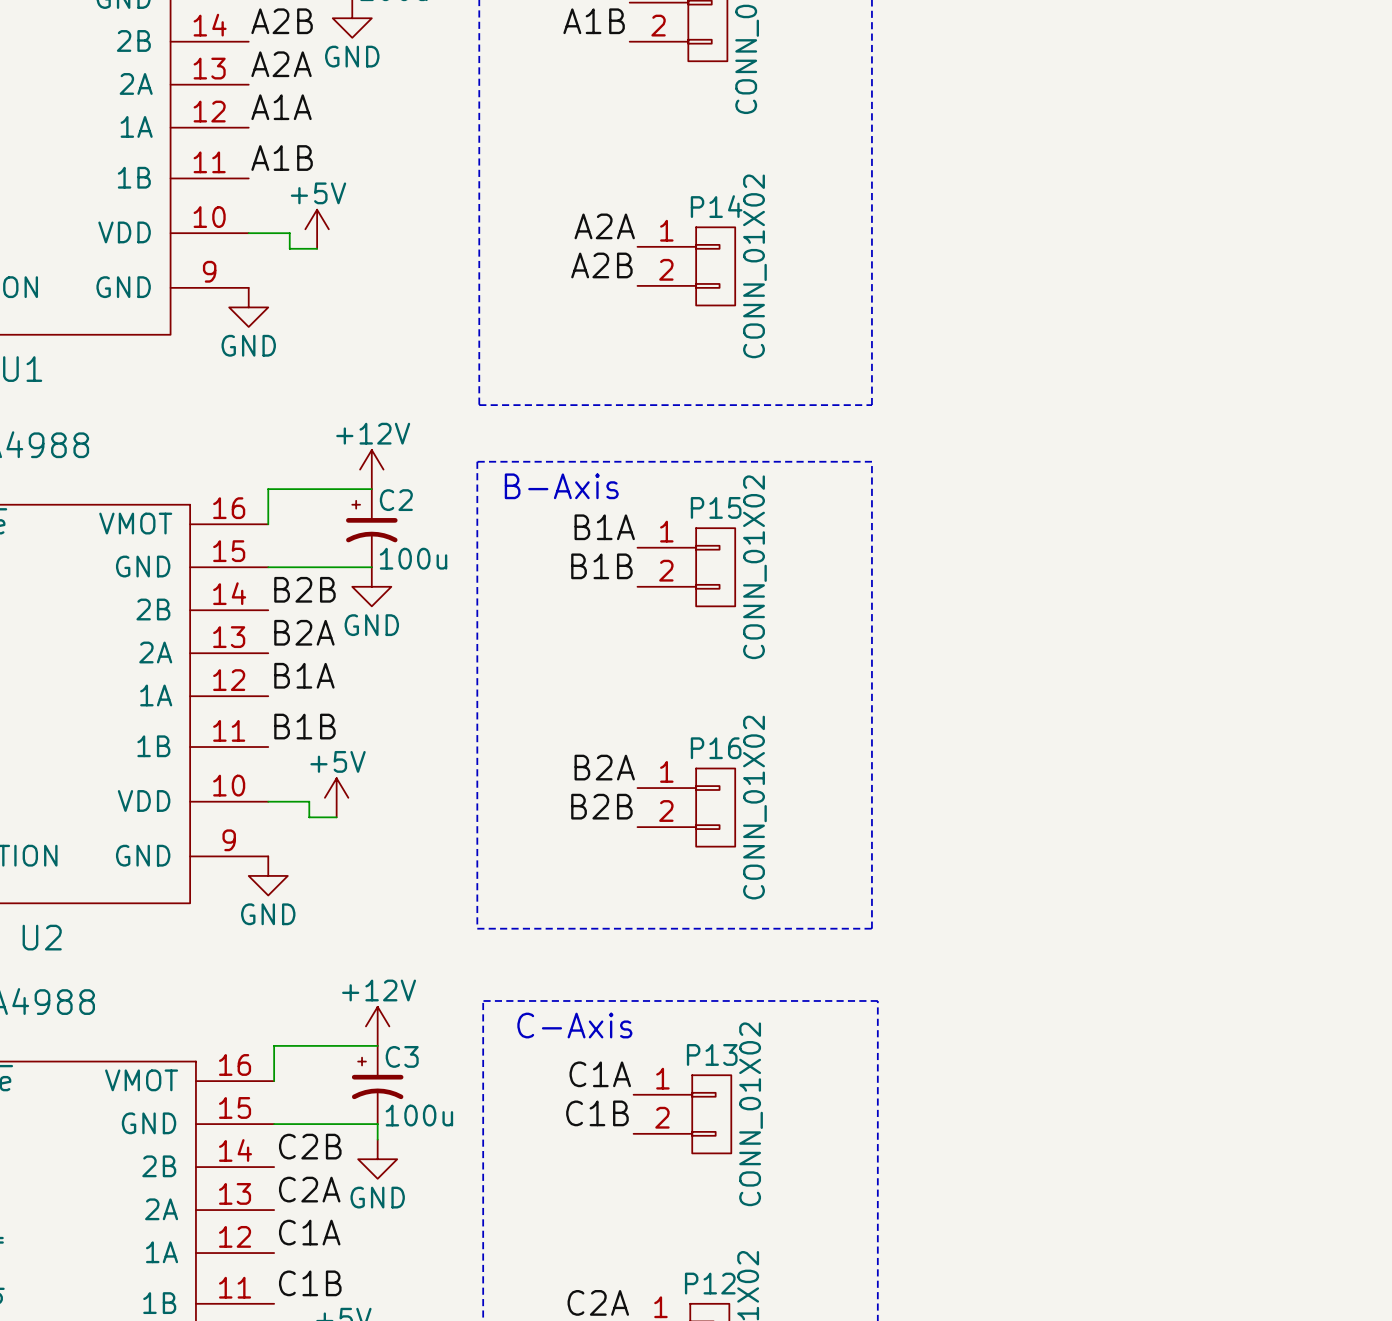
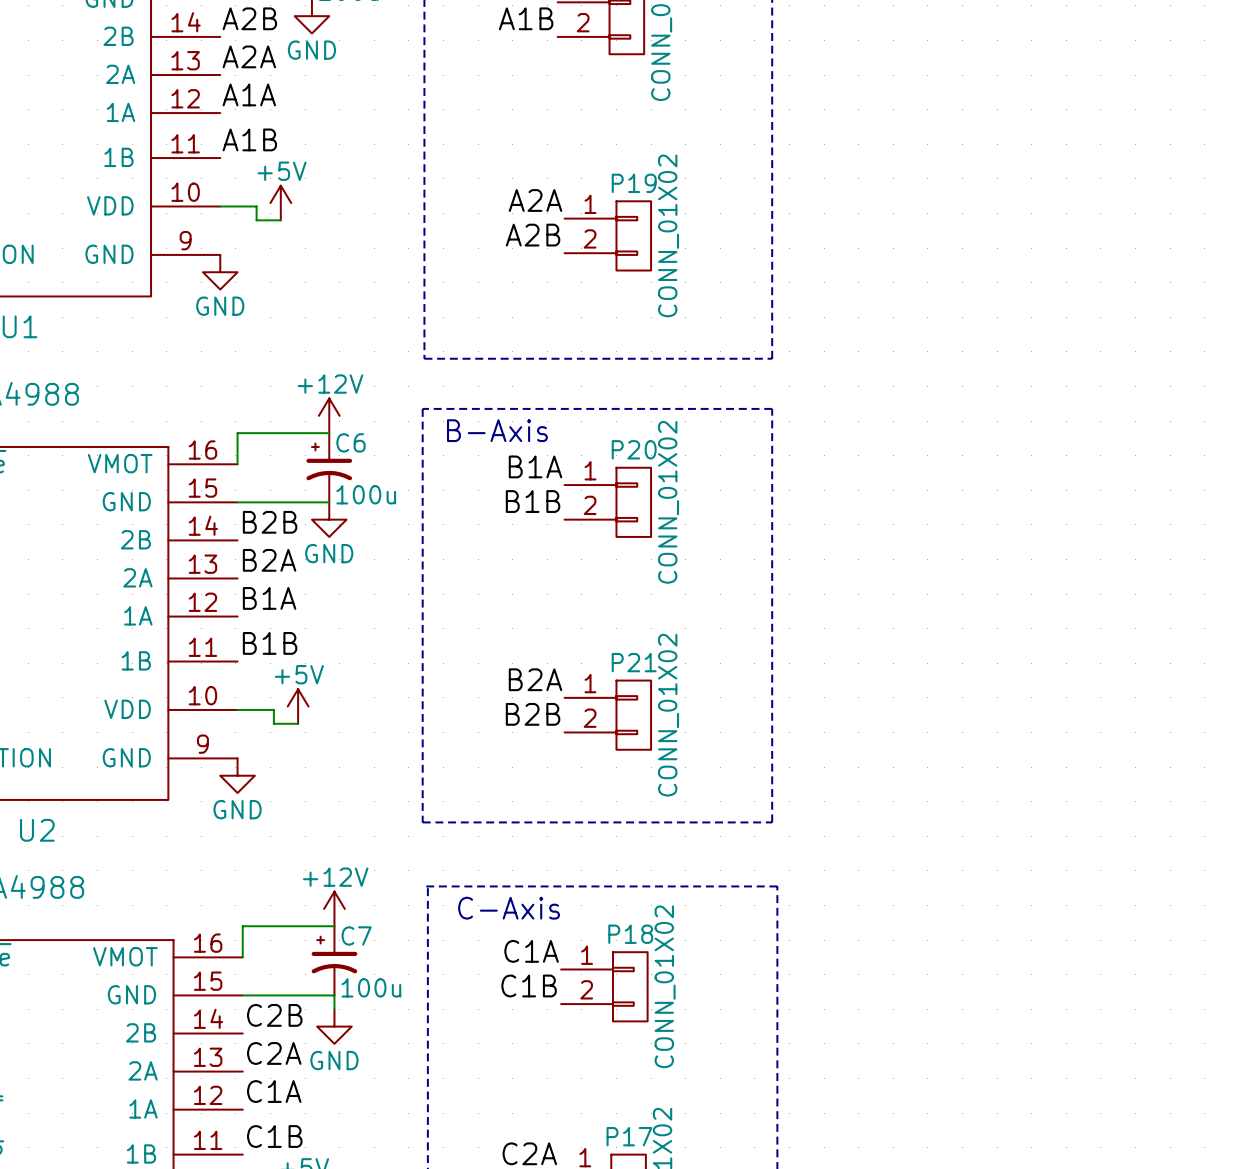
P14 name: P14 (716, 206) -> P19 (634, 183)
C2 name: C2 (396, 500) -> C6 (350, 442)
P15 name: P15 (716, 507) -> P20 (634, 449)
P16 name: P16 (716, 748) -> P21 (634, 662)
P13 name: P13 (712, 1054) -> P18 (630, 934)
C3 name: C3 (402, 1056) -> C7 (356, 935)
P12 name: P12 (710, 1283) -> P17 (629, 1136)

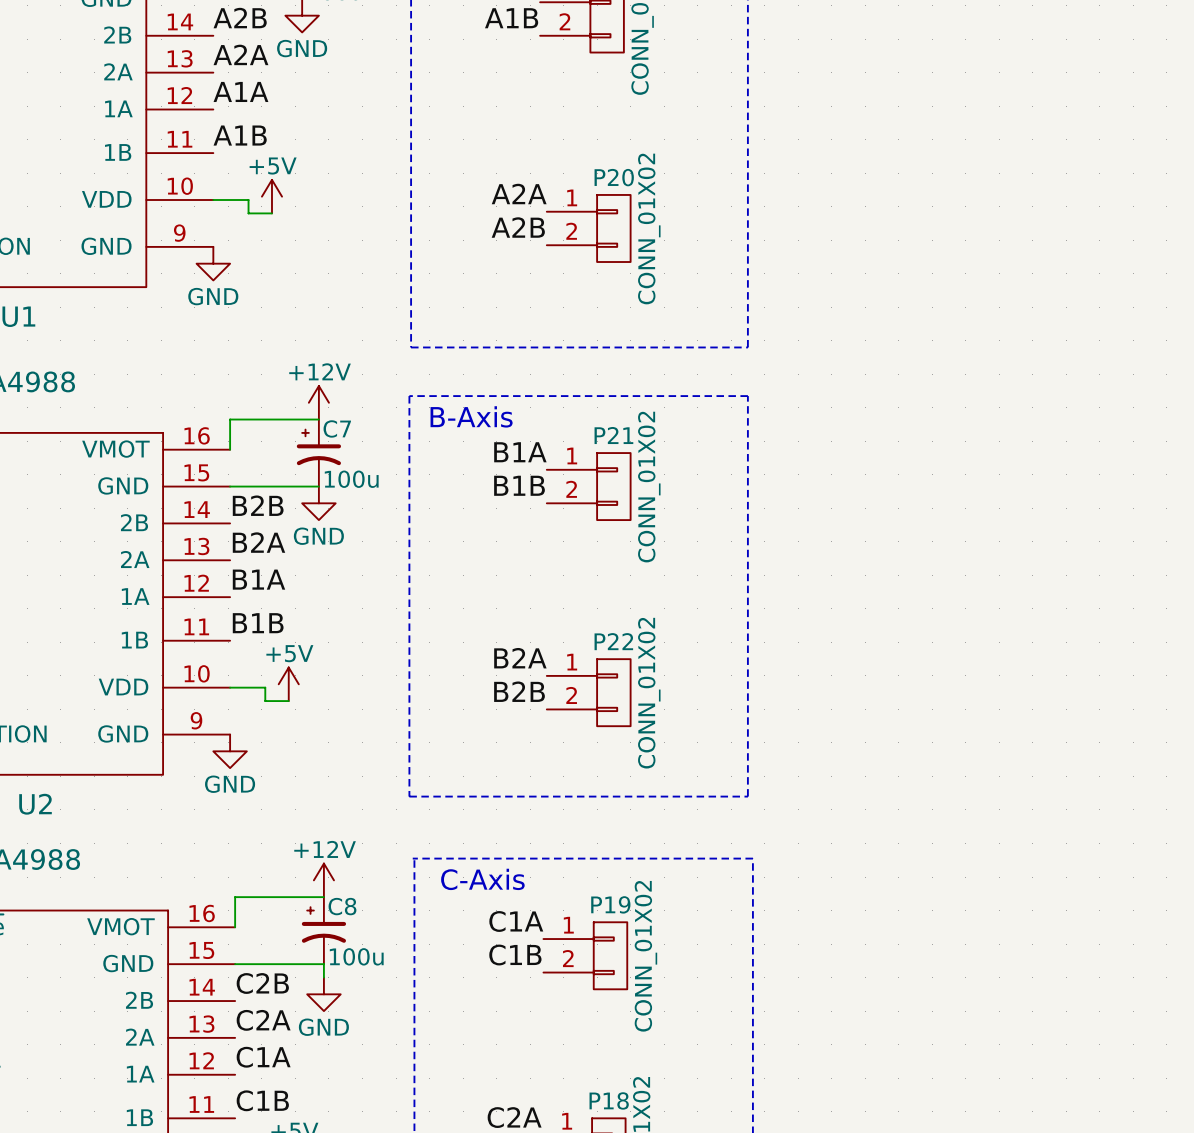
P19 name: P19 (634, 183) -> P20 (614, 177)
C6 name: C6 (350, 442) -> C7 (337, 428)
P20 name: P20 (634, 449) -> P21 (613, 435)
P21 name: P21 (634, 662) -> P22 (613, 641)
P18 name: P18 (630, 934) -> P19 (610, 904)
C7 name: C7 (356, 935) -> C8 (342, 906)
P17 name: P17 (629, 1136) -> P18 (609, 1100)

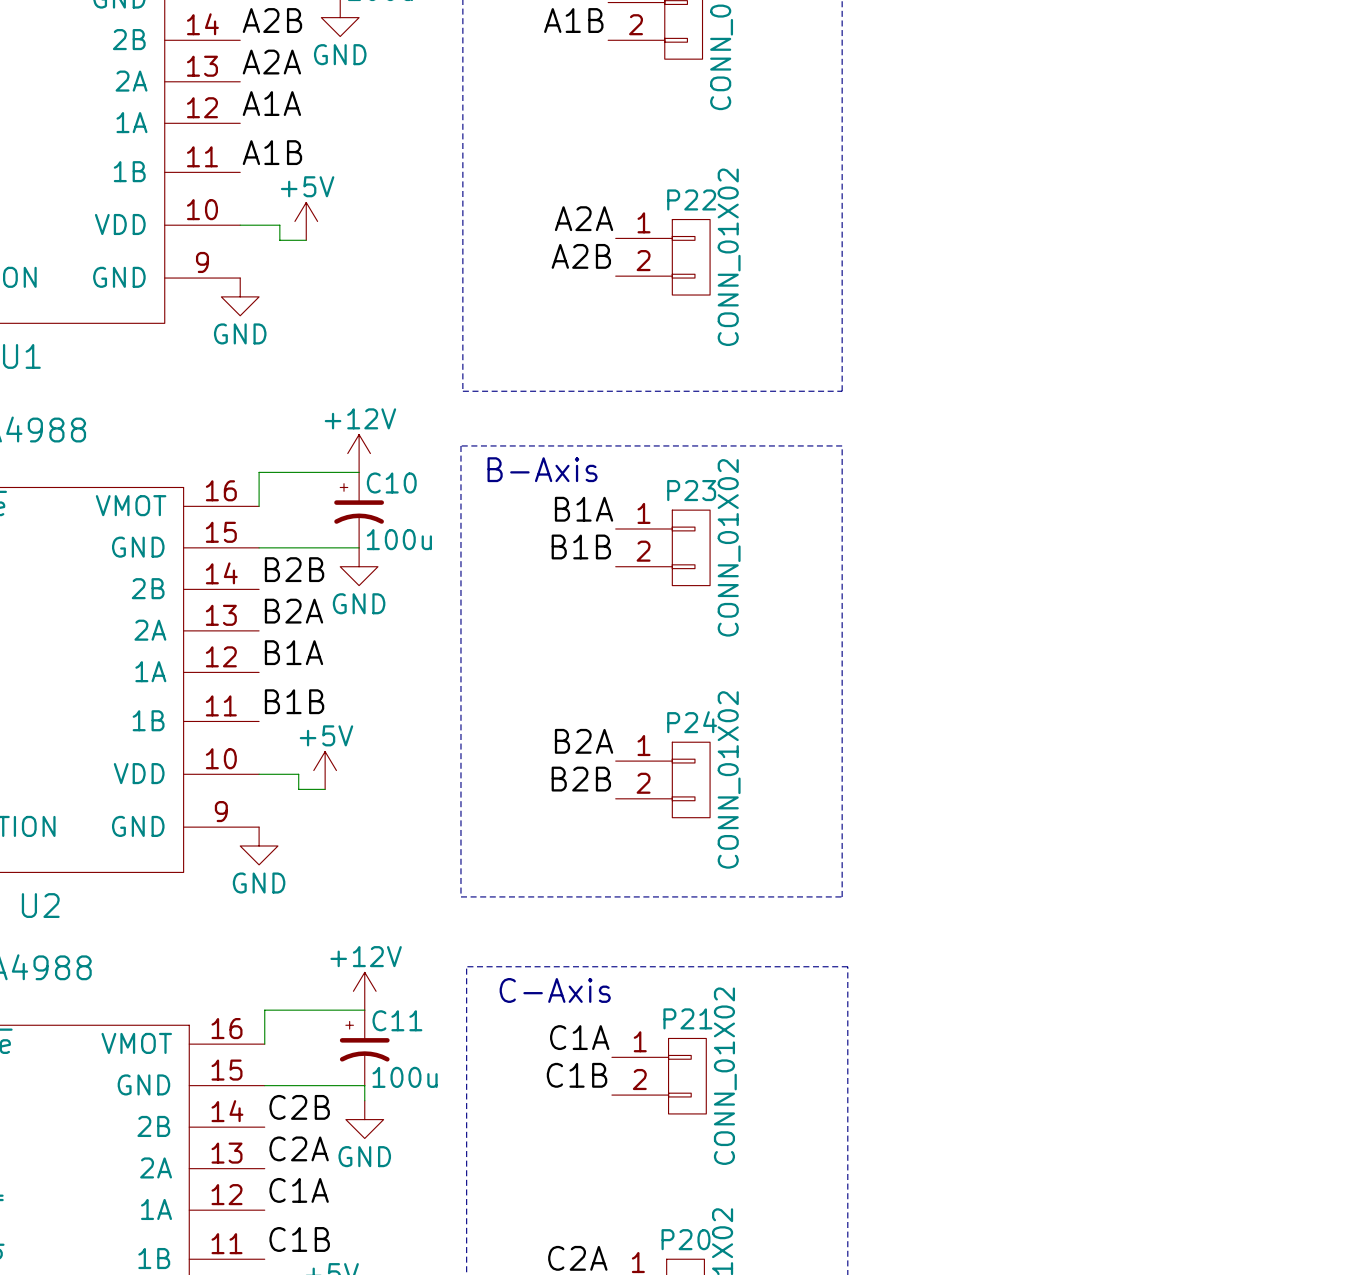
P20 name: P20 (614, 177) -> P22 (691, 199)
C7 name: C7 (337, 428) -> C10 (391, 483)
P21 name: P21 (613, 435) -> P23 (691, 490)
P22 name: P22 (613, 641) -> P24 (692, 722)
P19 name: P19 (610, 904) -> P21 (687, 1018)
C8 name: C8 (342, 906) -> C11 (397, 1020)
P18 name: P18 (609, 1100) -> P20 (685, 1239)

